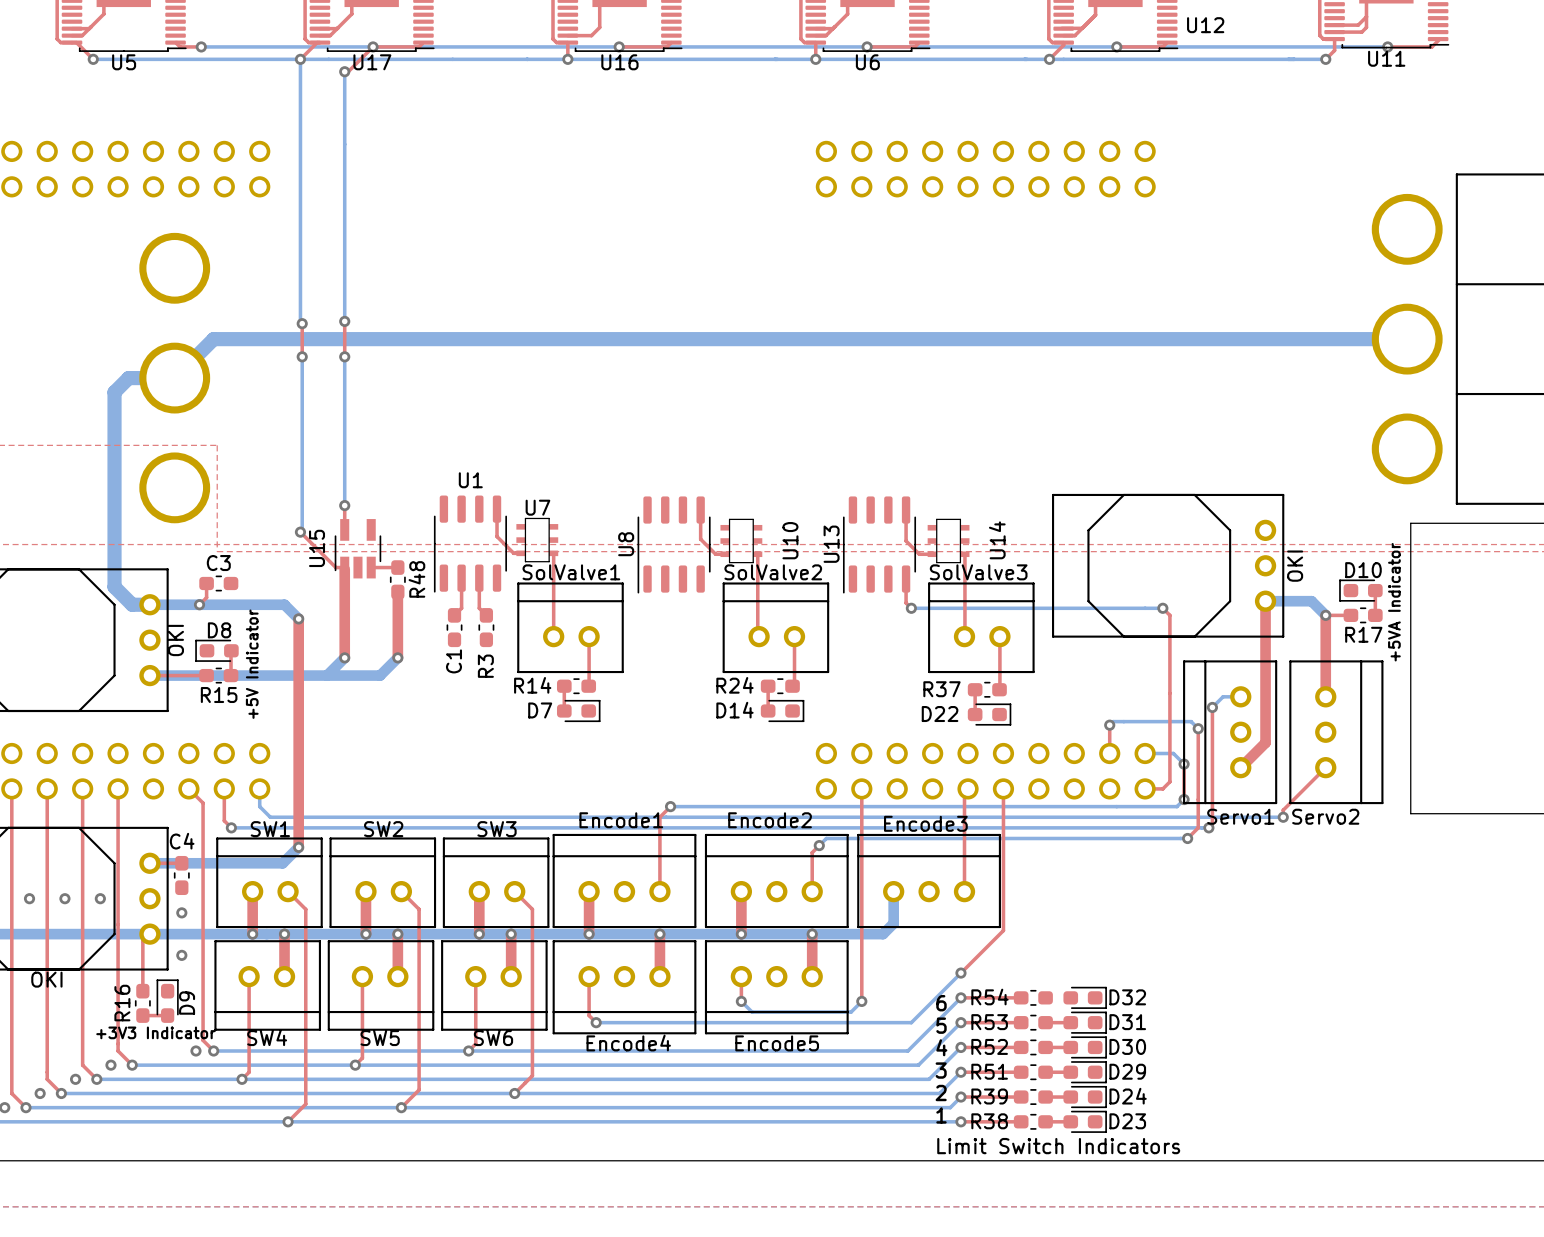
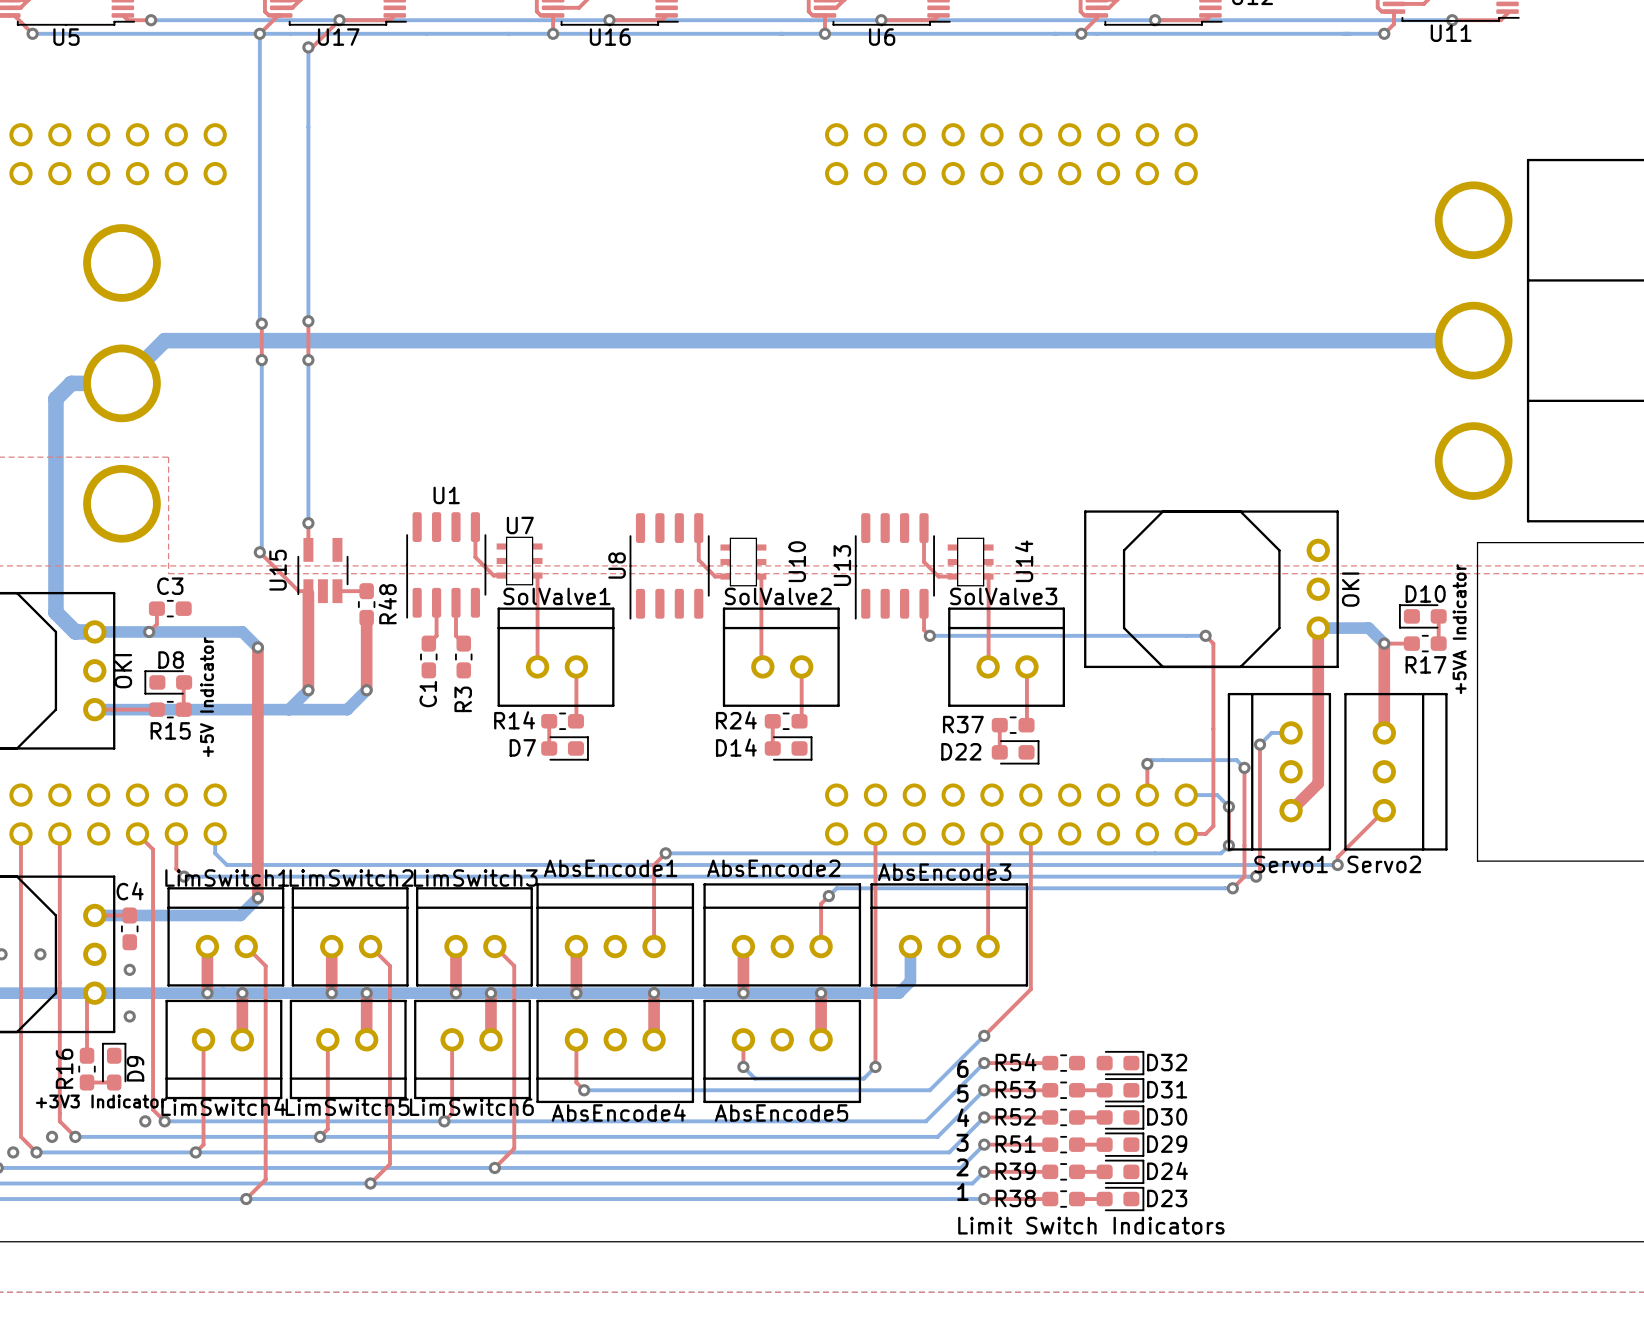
Encode1 name: Encode1 (621, 820) -> AbsEncode1 (610, 868)
Encode2 name: Encode2 (770, 820) -> AbsEncode2 (773, 868)
Encode3 name: Encode3 (925, 823) -> AbsEncode3 (944, 872)
SW1 name: SW1 (270, 829) -> LimSwitch1 (227, 878)
SW2 name: SW2 (383, 829) -> LimSwitch2 (351, 878)
SW3 name: SW3 (497, 829) -> LimSwitch3 (475, 878)
SW4 name: SW4 (267, 1037) -> LimSwitch4 (223, 1106)
SW5 name: SW5 (380, 1038) -> LimSwitch5 (347, 1107)
SW6 name: SW6 (493, 1038) -> LimSwitch6 (471, 1107)
Encode4 name: Encode4 (628, 1043) -> AbsEncode4 (618, 1112)
Encode5 name: Encode5 (777, 1043) -> AbsEncode5 (781, 1113)

